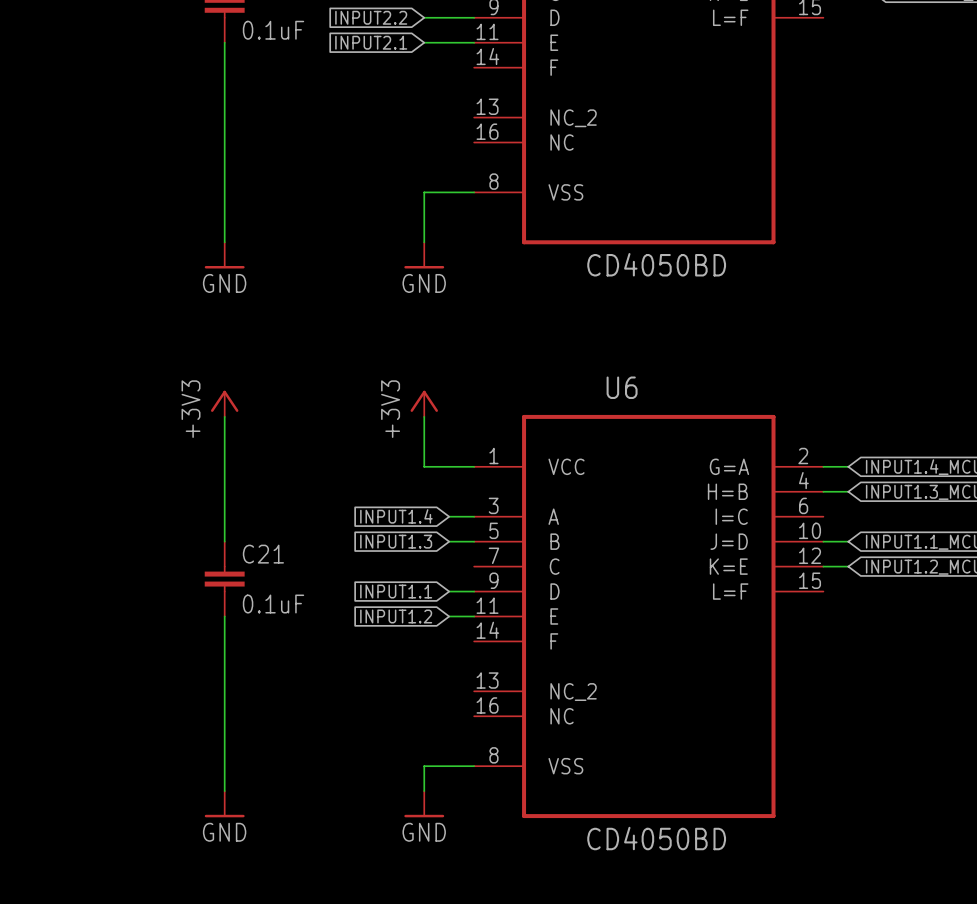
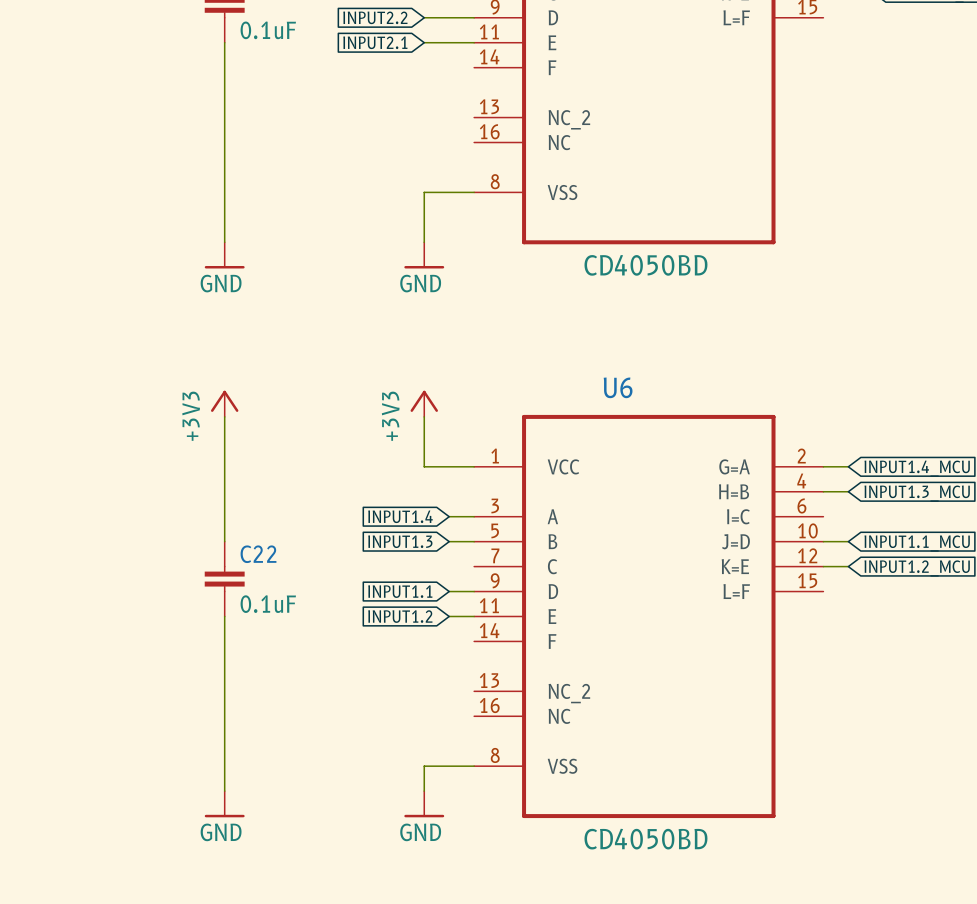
C21 name: C21 (263, 554) -> C22 (258, 554)

